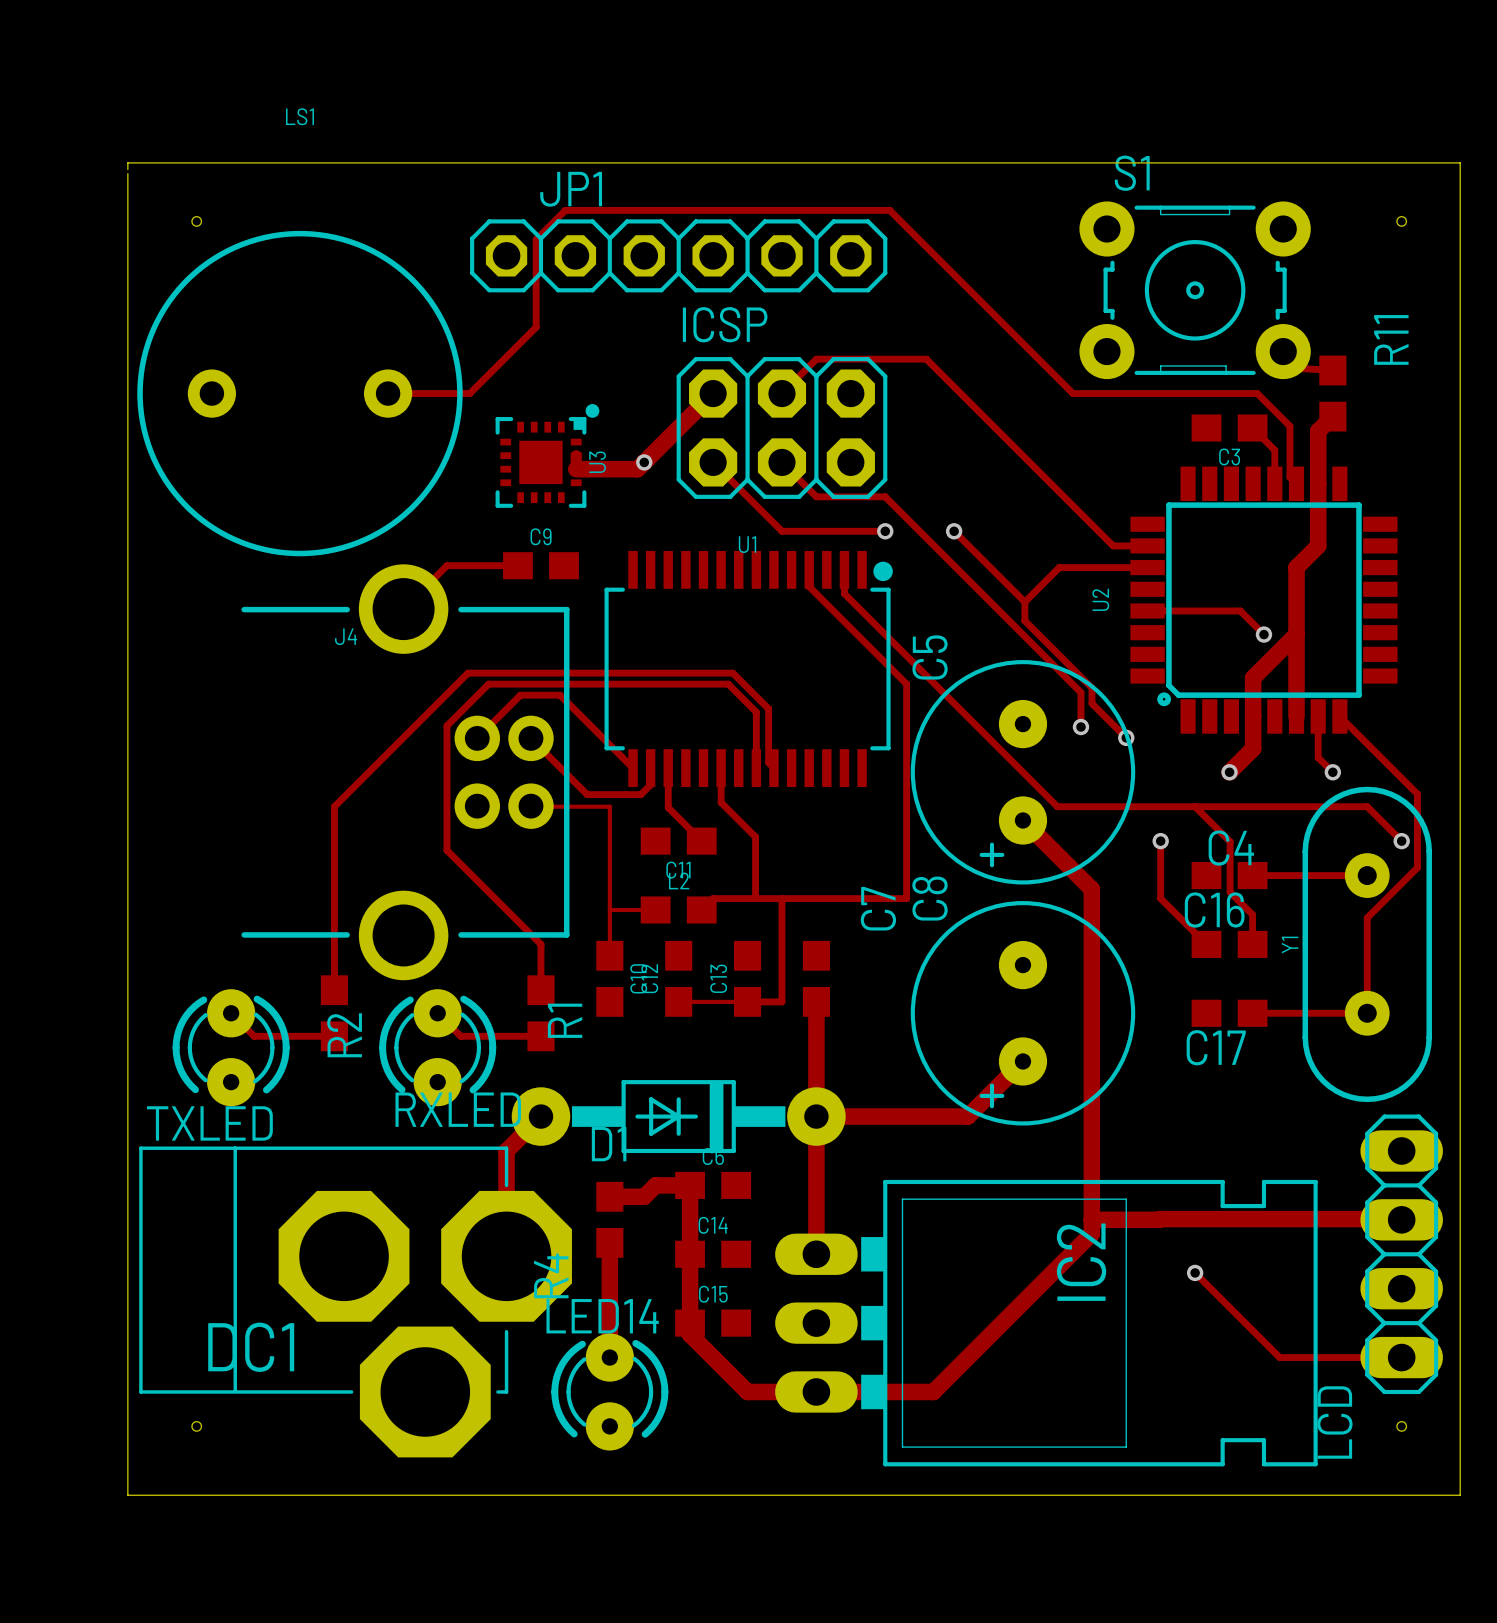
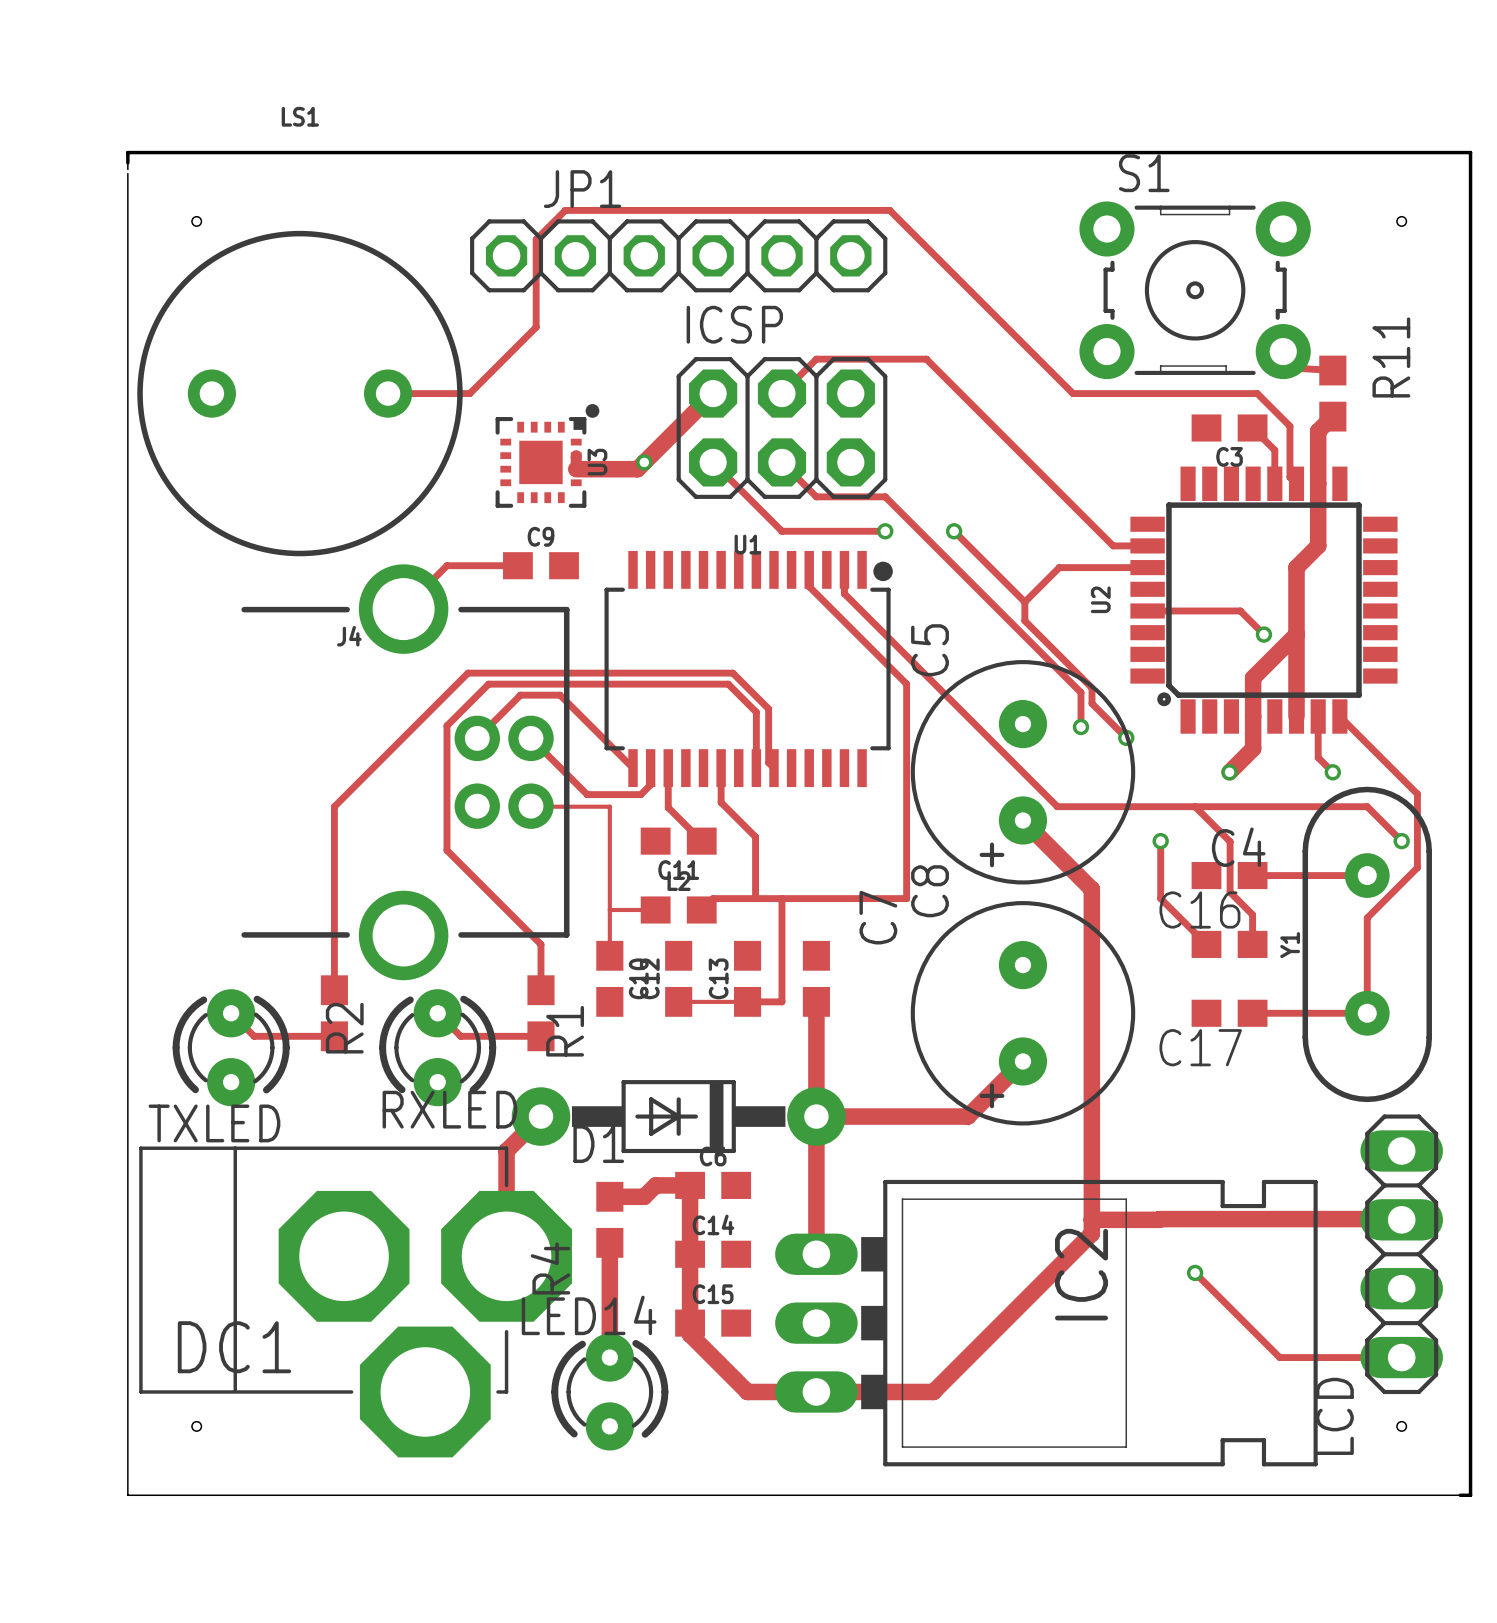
board edge: (127, 162) (1460, 162) (1460, 1495) -> (127, 162) (127, 152) (1470, 152) (1470, 1495) (1460, 1495)

